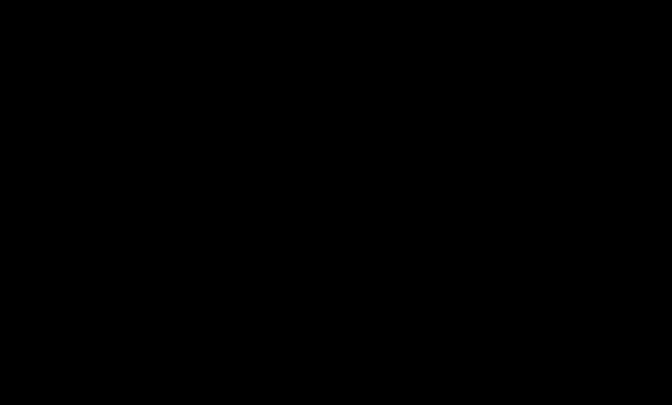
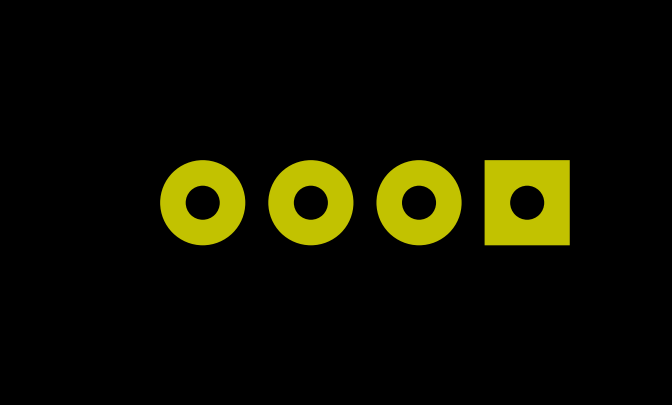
part: none -> (364, 202)

